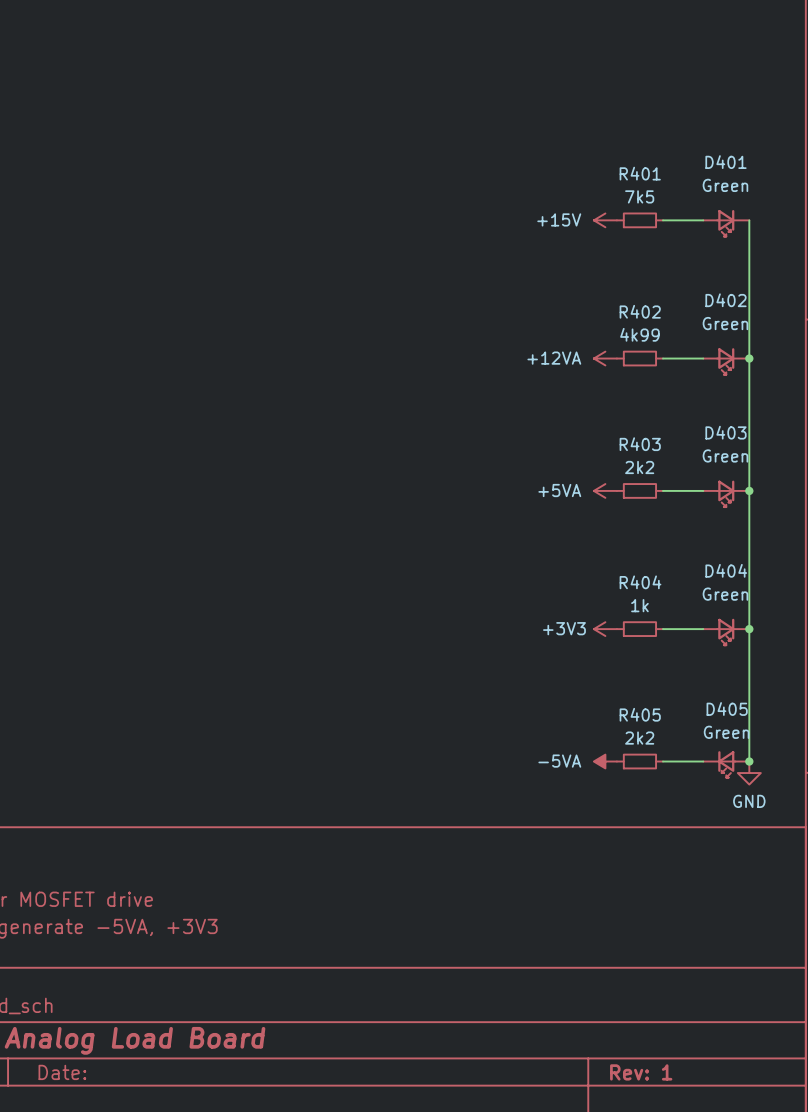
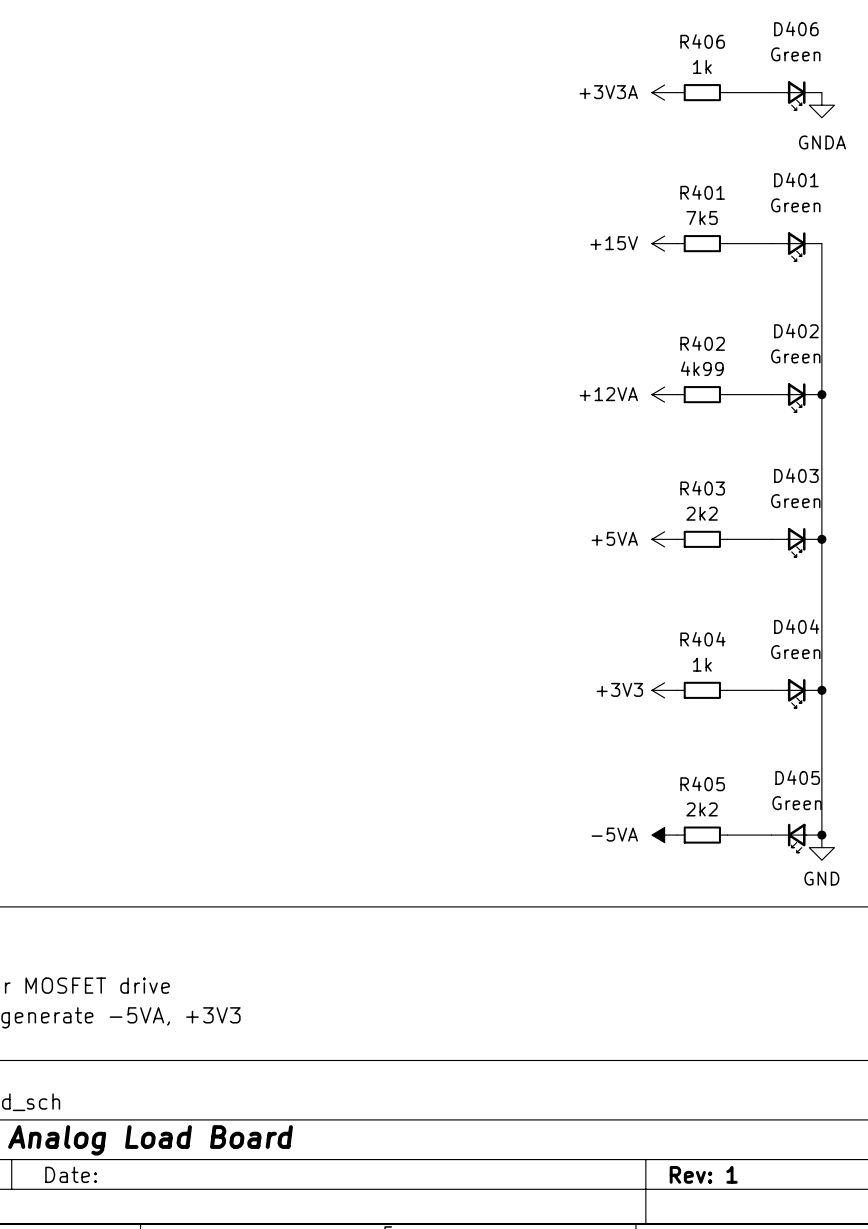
power symbol: none -> +3V3A (664, 92)
R406: none -> 1k (702, 92)
wire: none -> (727, 92) (771, 92)
D406: none -> Green (796, 95)
power symbol: none -> GNDA (821, 105)

